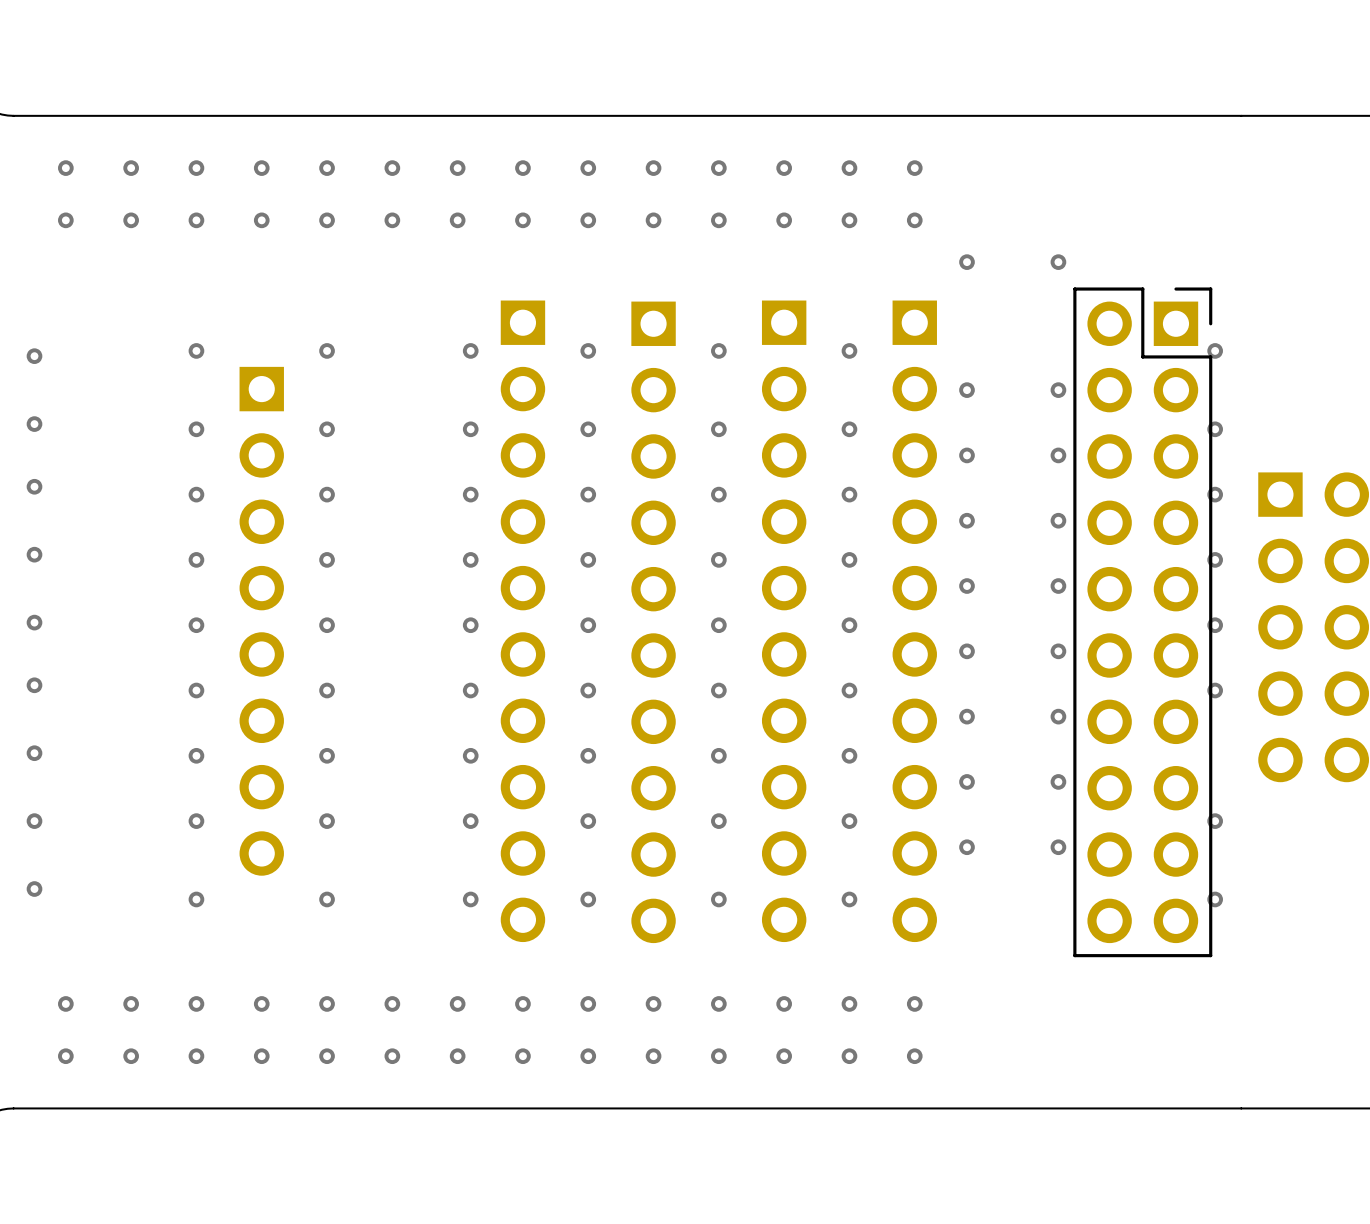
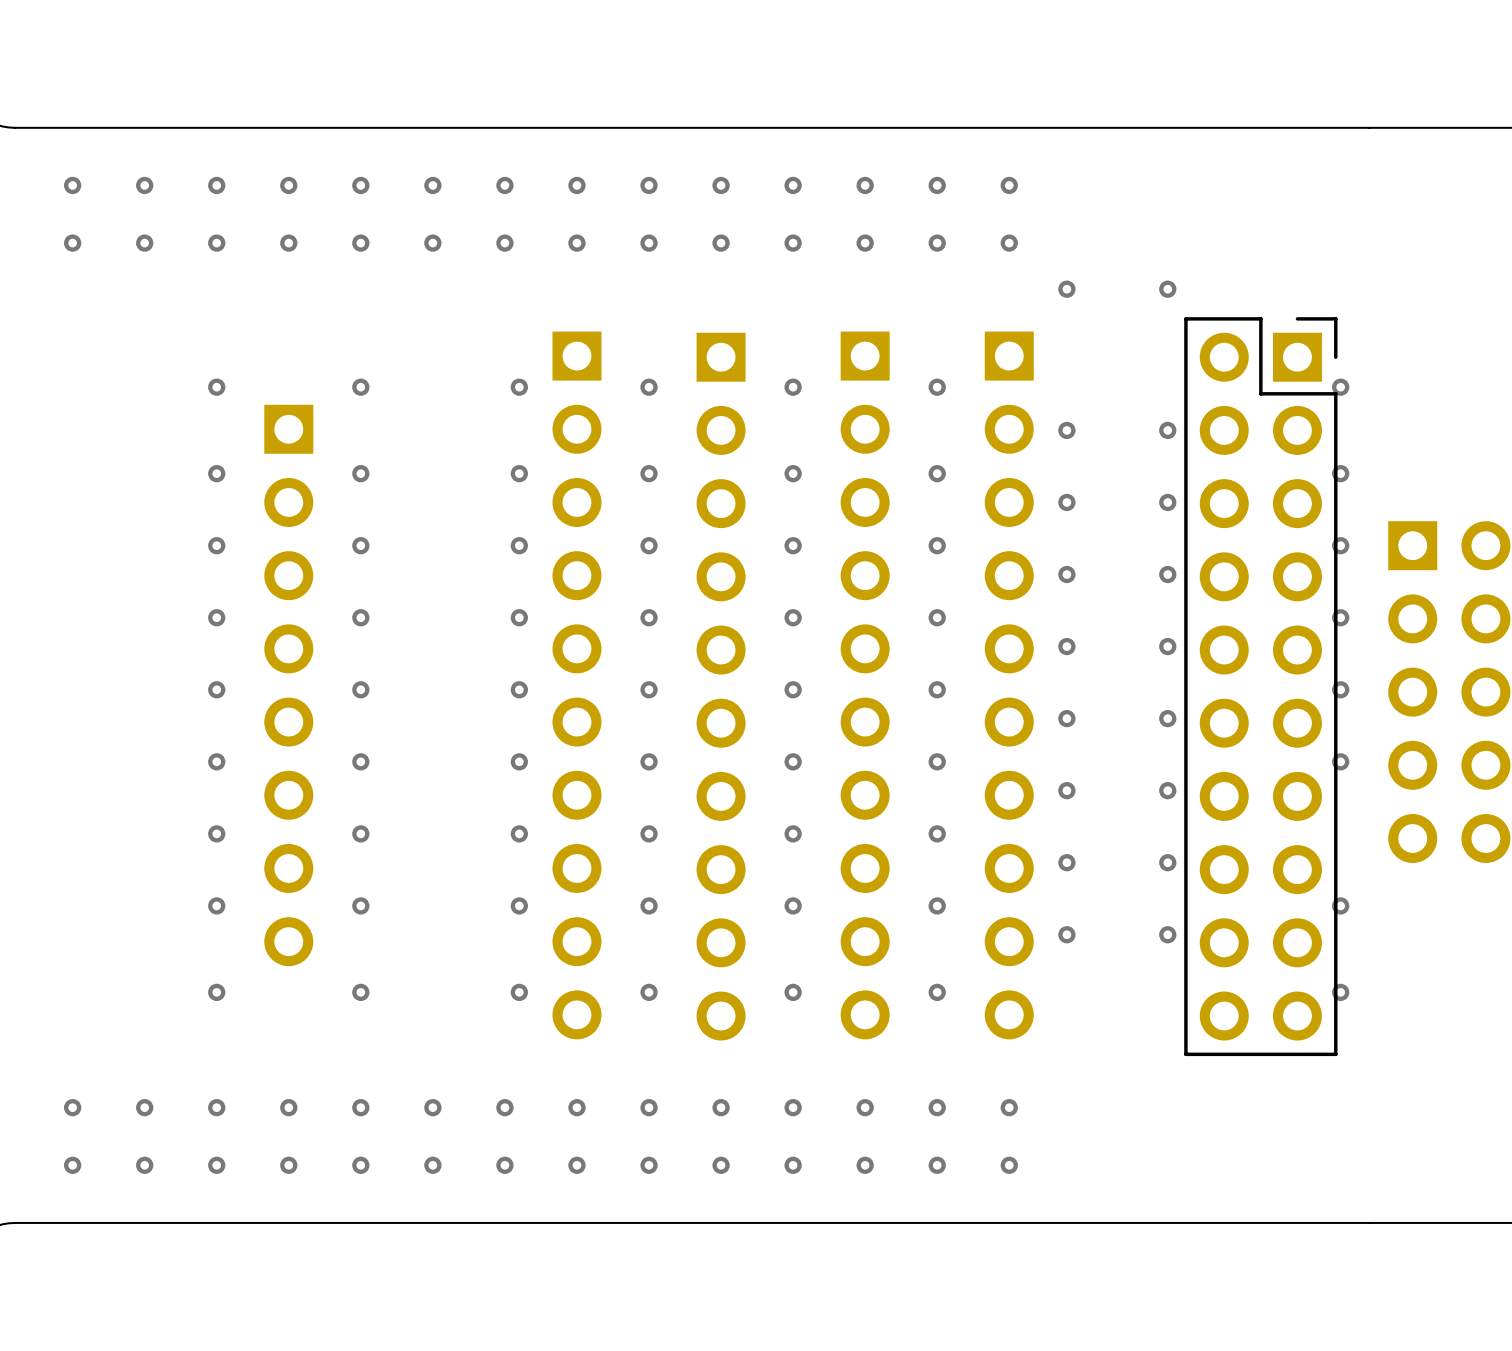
via: (34, 356) -> none
via: (34, 424) -> none
via: (34, 486) -> none
via: (34, 554) -> none
via: (34, 622) -> none
via: (34, 685) -> none
via: (34, 753) -> none
via: (34, 821) -> none
via: (34, 889) -> none

